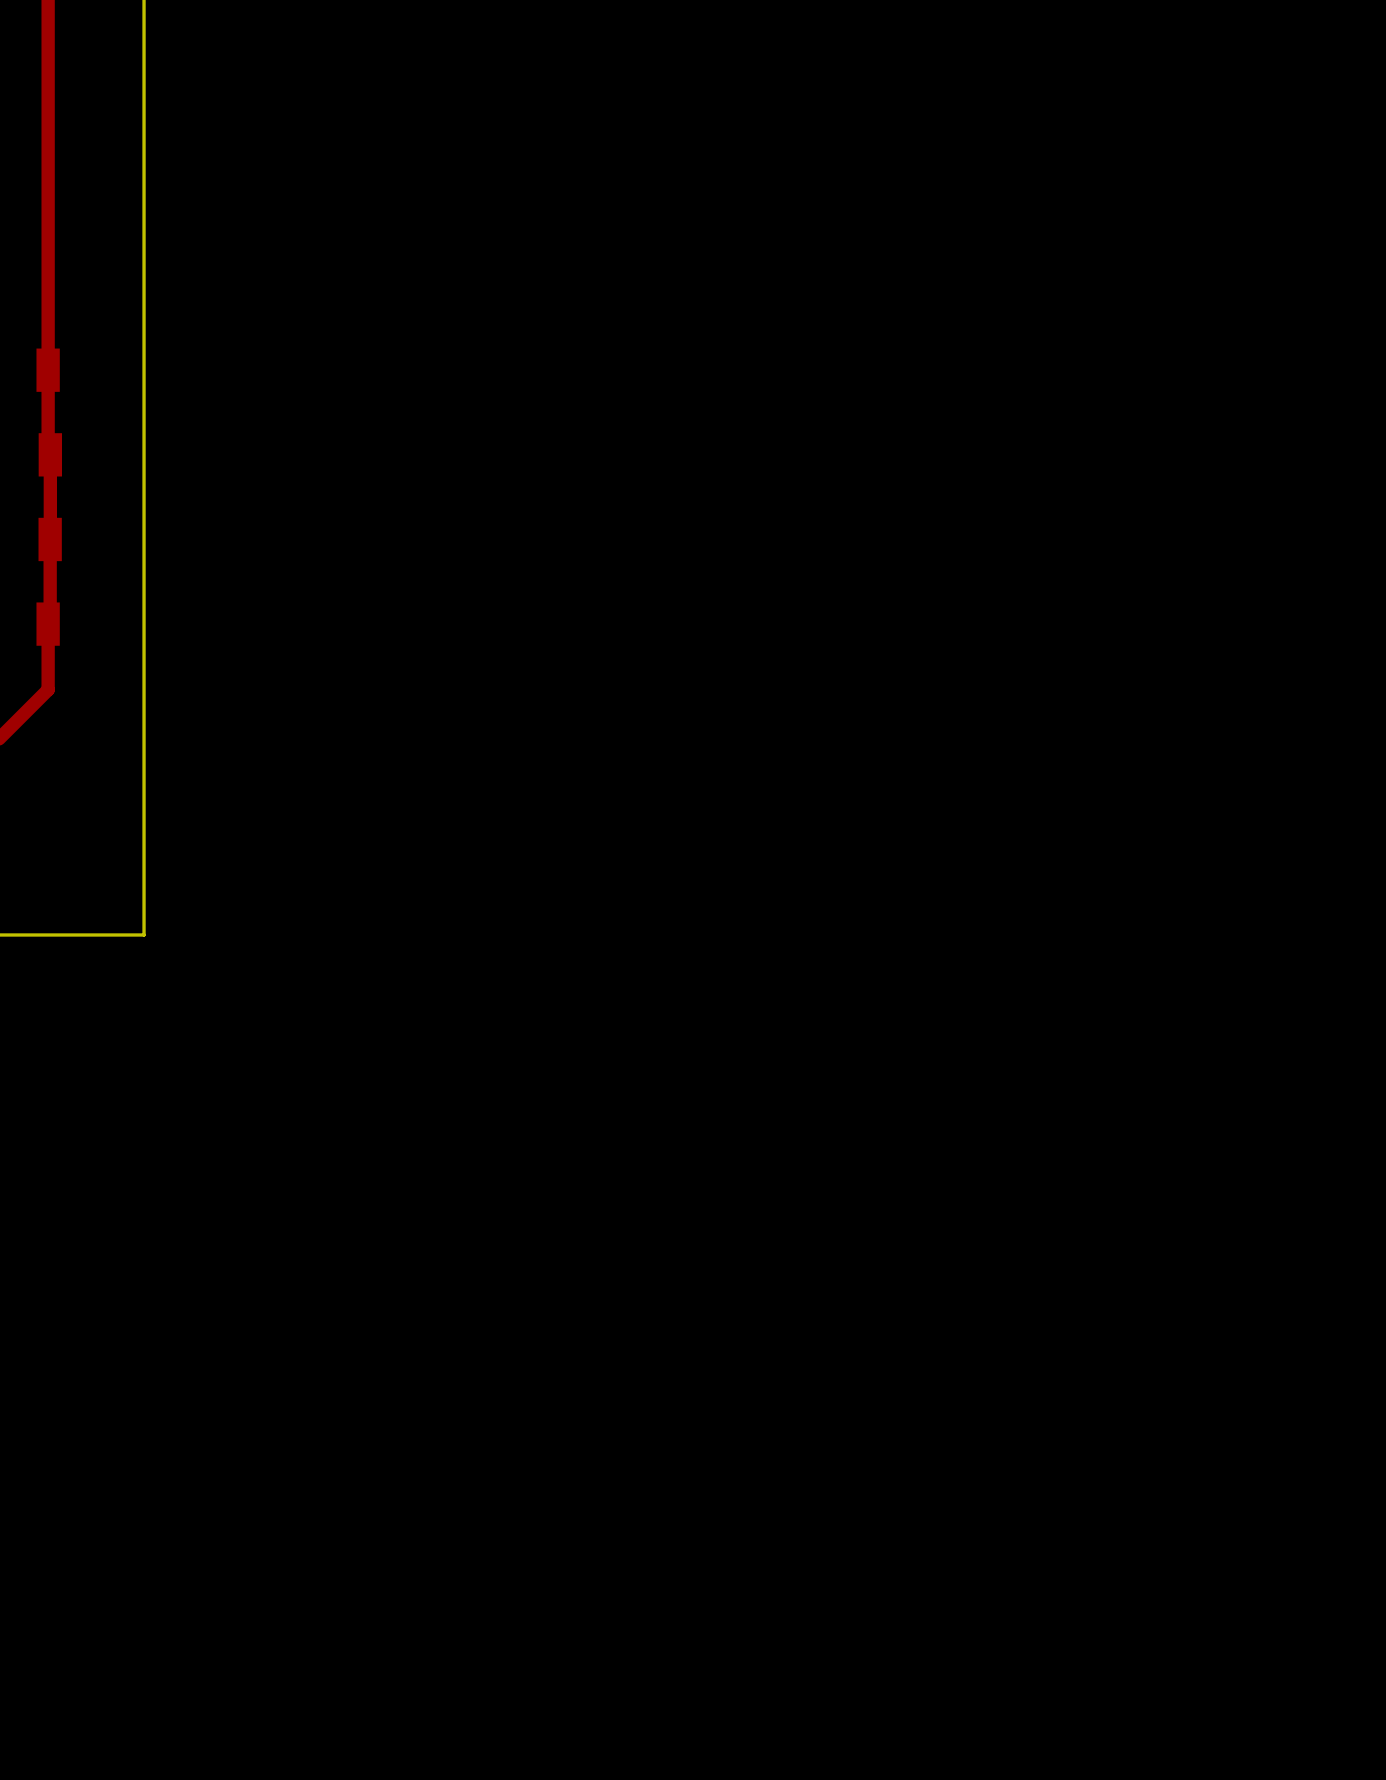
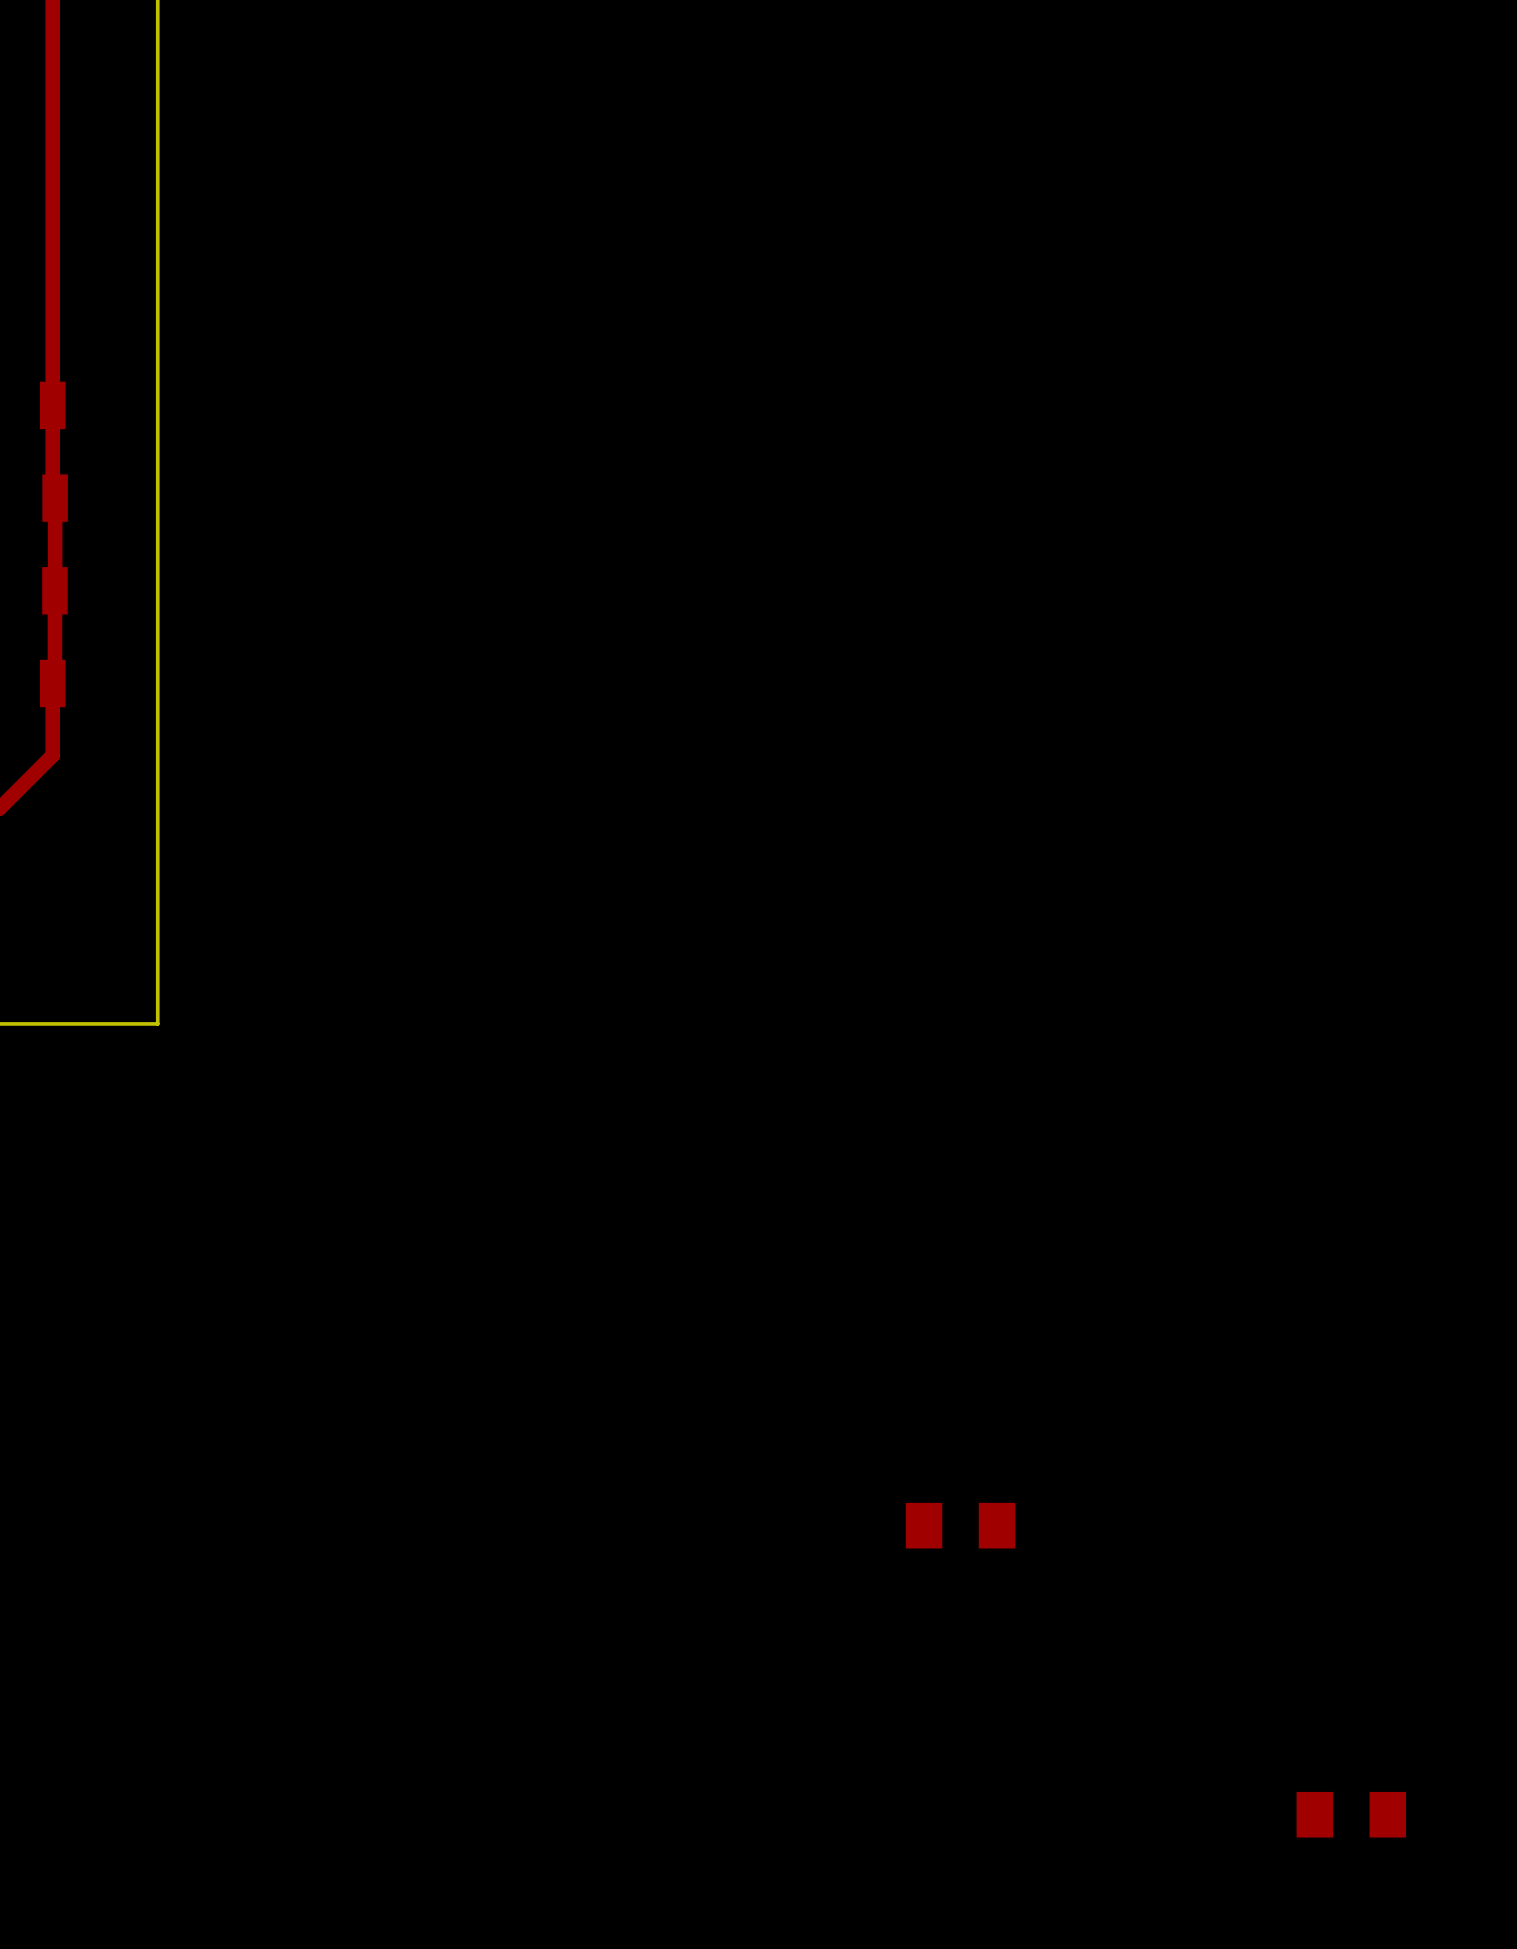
part: none -> (960, 1525)
part: none -> (1351, 1814)

